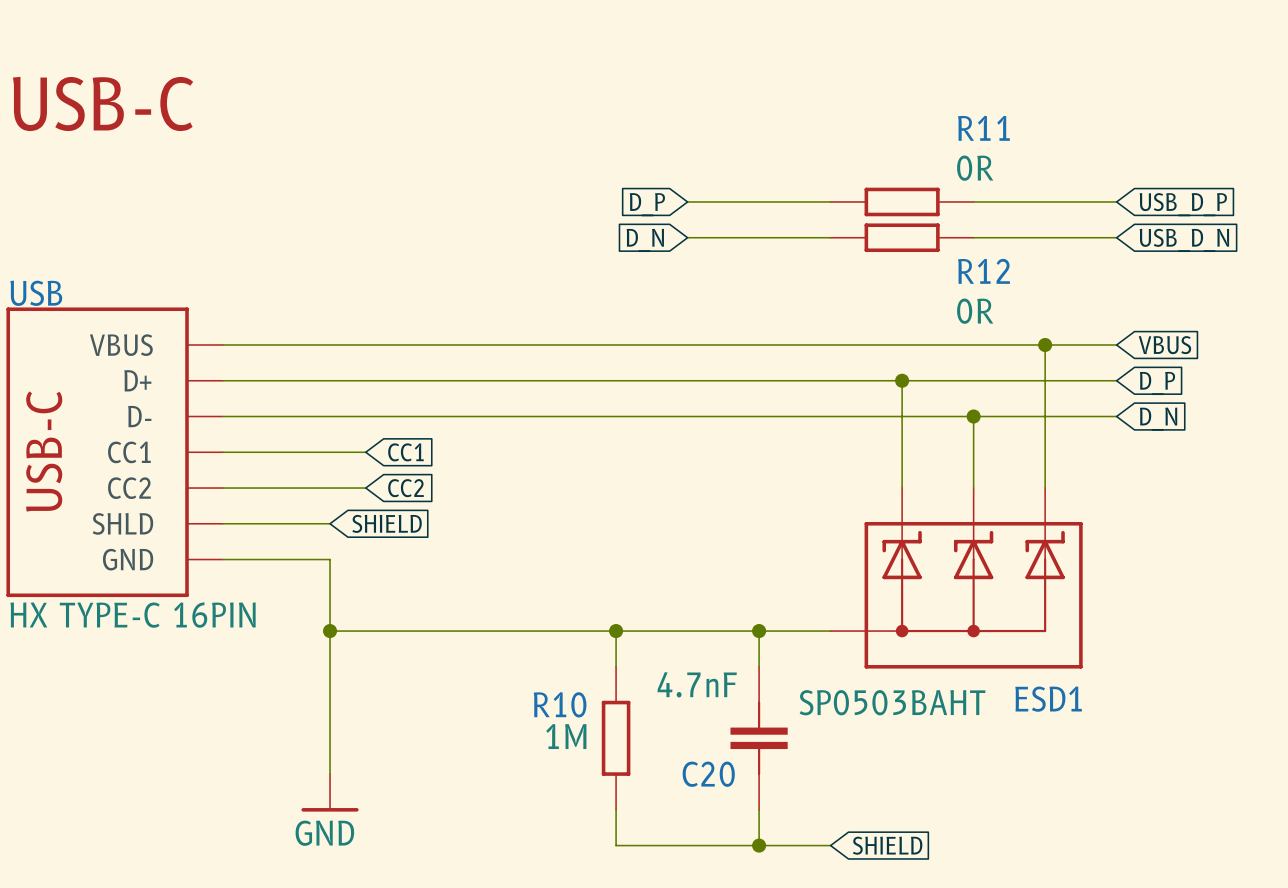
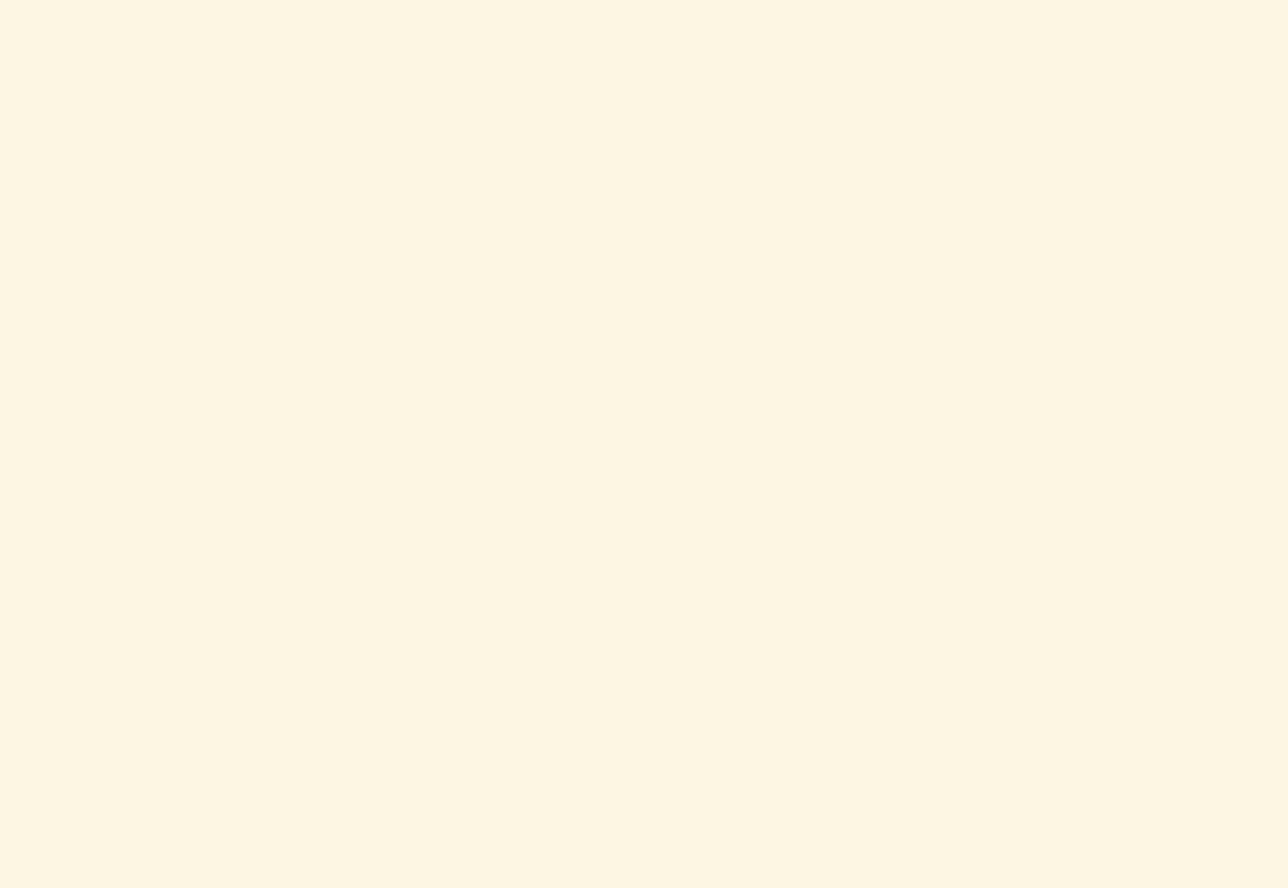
text: USB-C (103, 103) -> none
wire: (687, 201) (830, 201) -> none
R11: 0R (902, 201) -> none
wire: (973, 201) (1116, 201) -> none
global label: D_P (647, 204) -> none
global label: USB_D_P (1183, 204) -> none
wire: (687, 237) (830, 237) -> none
R12: 0R (902, 237) -> none
wire: (973, 237) (1116, 237) -> none
global label: D_N (645, 240) -> none
global label: USB_D_N (1184, 240) -> none
wire: (222, 345) (1116, 345) -> none
wire: (1045, 345) (1045, 488) -> none
junction: (1045, 345) -> none
global label: VBUS (1164, 345) -> none
wire: (222, 380) (1116, 380) -> none
wire: (902, 380) (902, 488) -> none
junction: (902, 380) -> none
global label: D_P (1157, 383) -> none
wire: (222, 416) (1116, 416) -> none
wire: (973, 416) (973, 488) -> none
junction: (973, 416) -> none
global label: D_N (1158, 419) -> none
USB: HX TYPE-C 16PIN (114, 452) -> none
wire: (222, 452) (365, 452) -> none
global label: CC1 (405, 452) -> none
wire: (222, 488) (365, 488) -> none
global label: CC2 (405, 488) -> none
wire: (222, 523) (330, 523) -> none
global label: SHIELD (387, 523) -> none
wire: (222, 559) (330, 559) (330, 774) -> none
ESD1: (956, 578) -> none
wire: (330, 631) (830, 631) -> none
junction: (330, 631) -> none
wire: (616, 631) (616, 666) -> none
junction: (616, 631) -> none
wire: (759, 631) (759, 666) -> none
junction: (759, 631) -> none
R10: 1M (616, 738) -> none
C20: 4.7nF (759, 738) -> none
power symbol: GND (330, 792) -> none
wire: (616, 809) (616, 845) (830, 845) -> none
wire: (759, 809) (759, 845) -> none
junction: (759, 845) -> none
global label: SHIELD (887, 845) -> none

